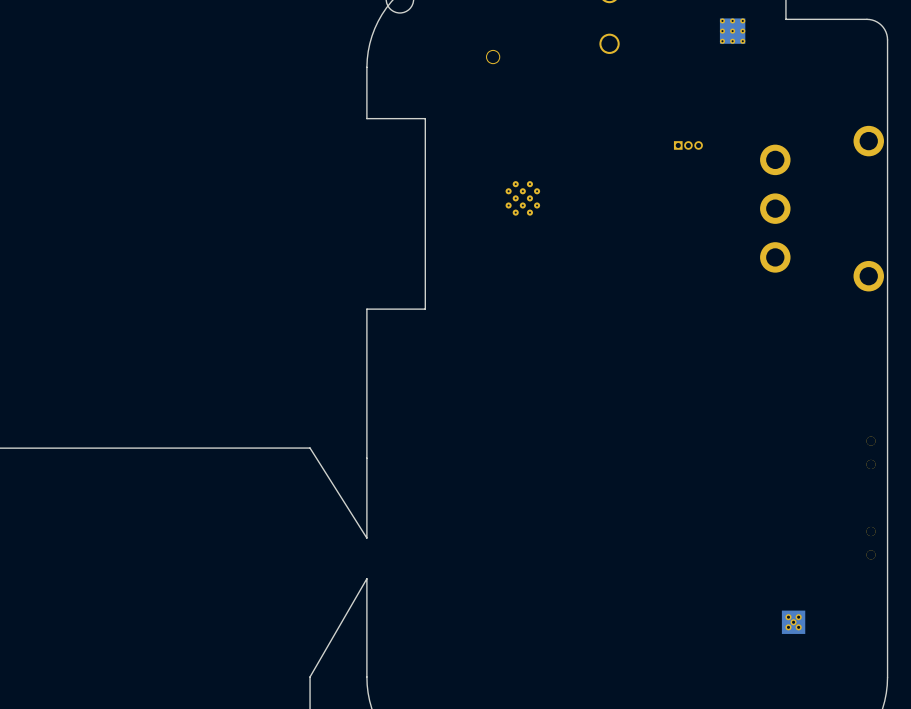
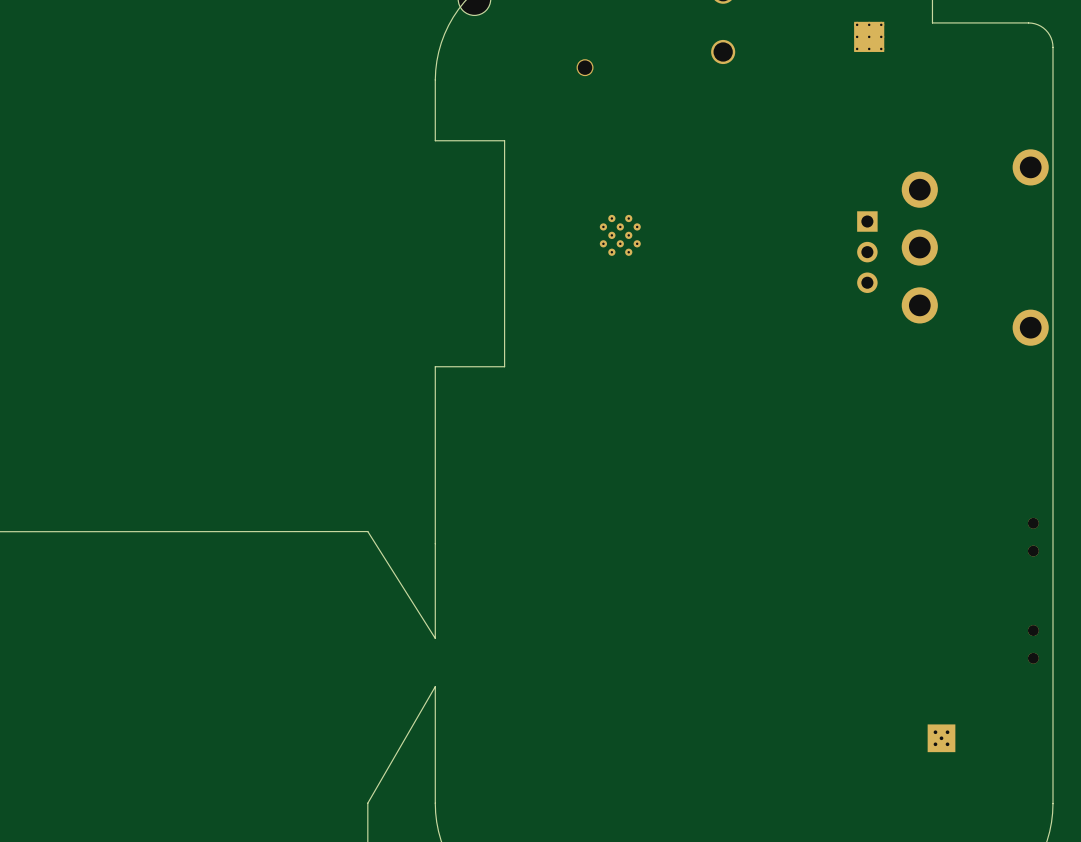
part: (688, 145) -> none
part: none -> (867, 252)

